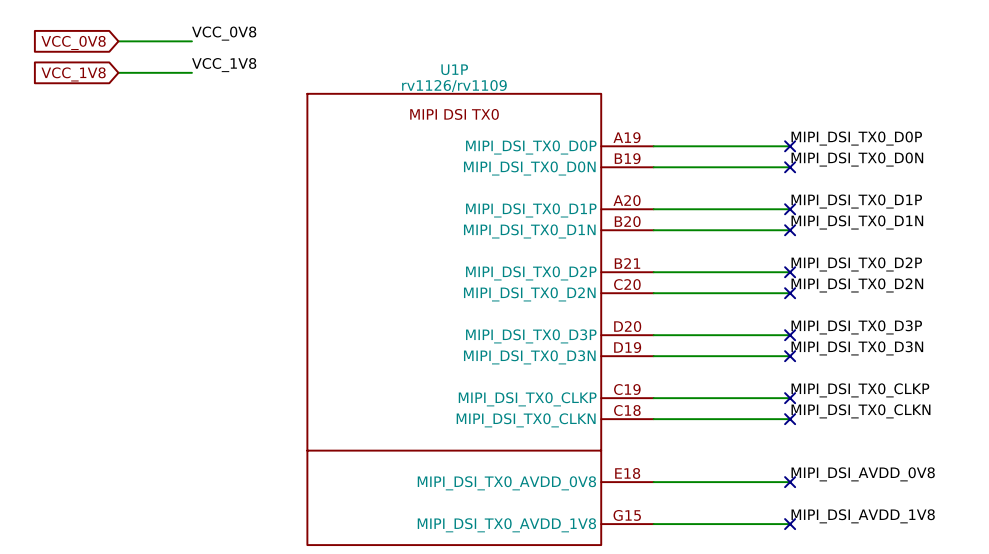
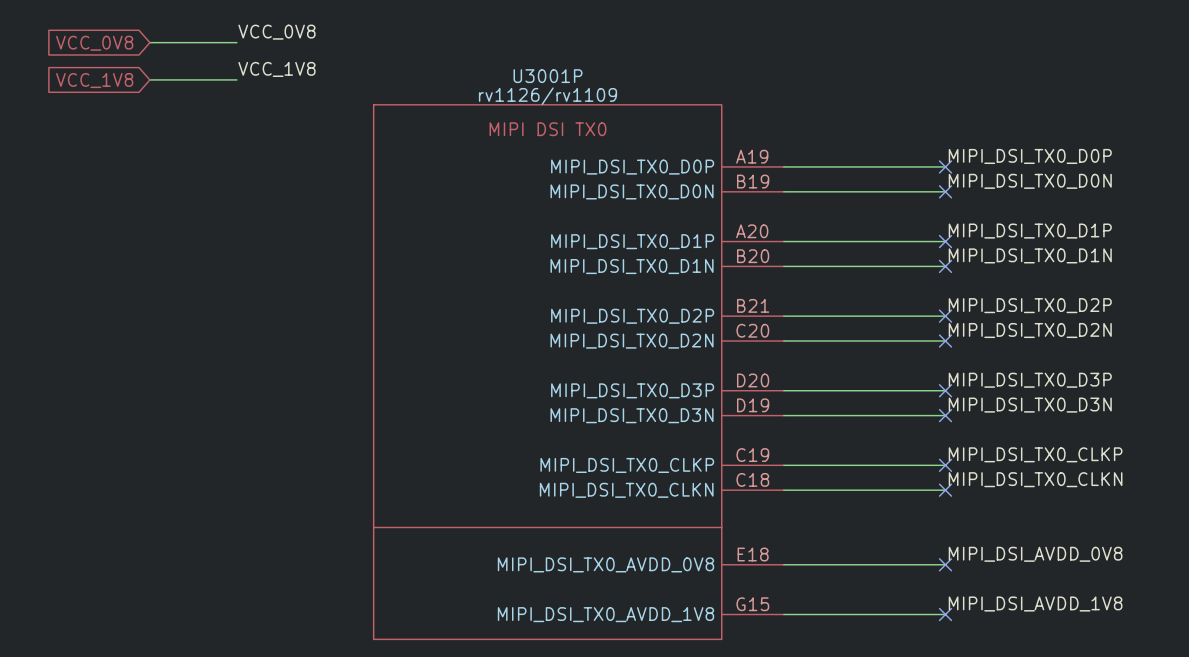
U1P name: U1P (454, 69) -> U3001P (547, 76)

